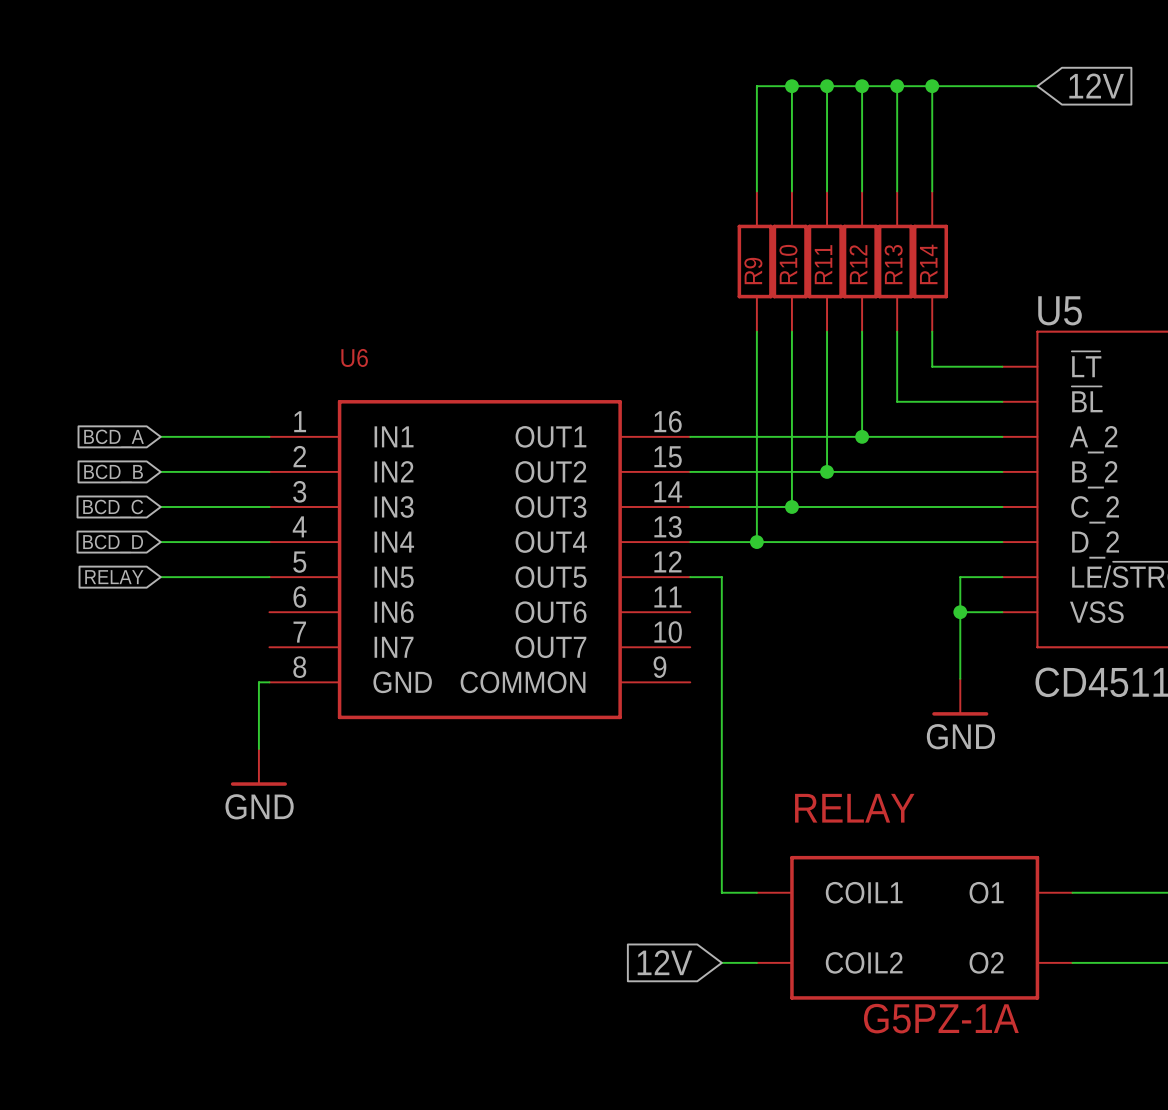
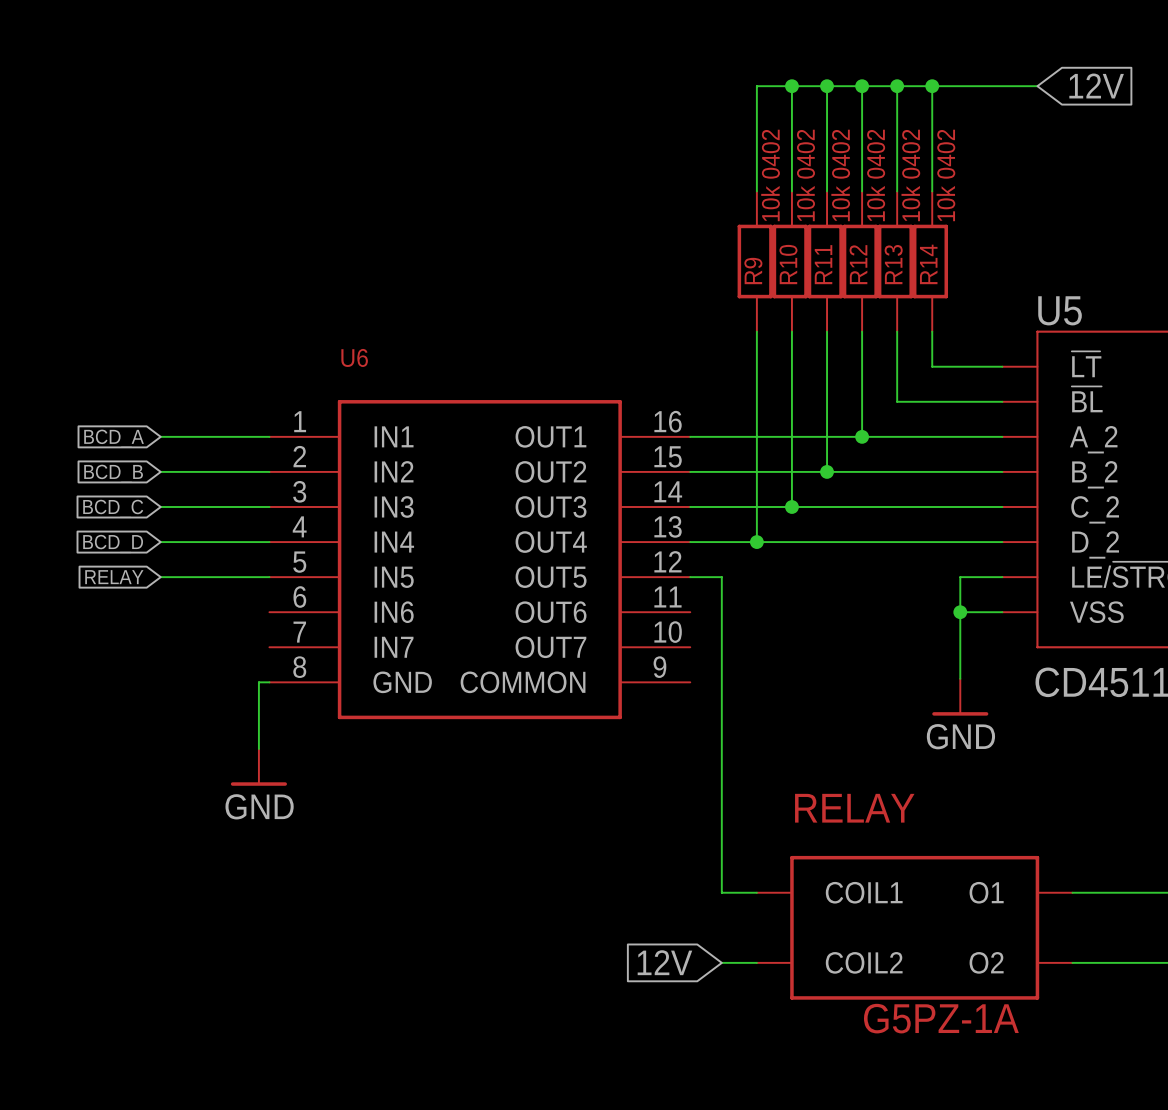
R9 value: none -> 10k 0402 (770, 175)
R10 value: none -> 10k 0402 (805, 175)
R11 value: none -> 10k 0402 (840, 175)
R12 value: none -> 10k 0402 (875, 175)
R13 value: none -> 10k 0402 (910, 175)
R14 value: none -> 10k 0402 (945, 175)

